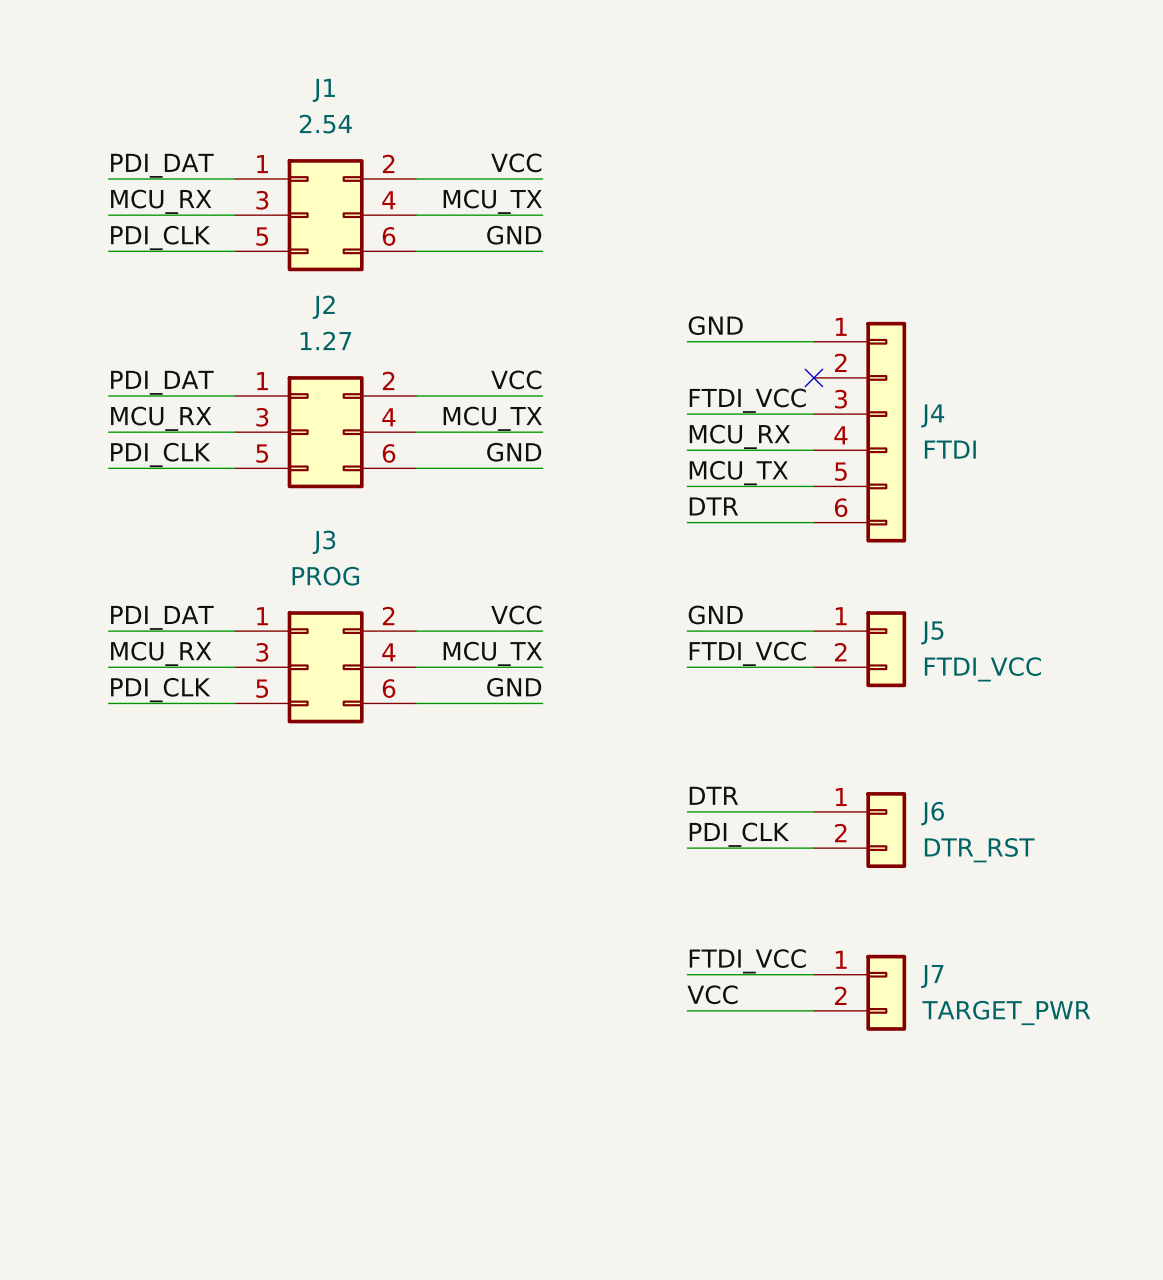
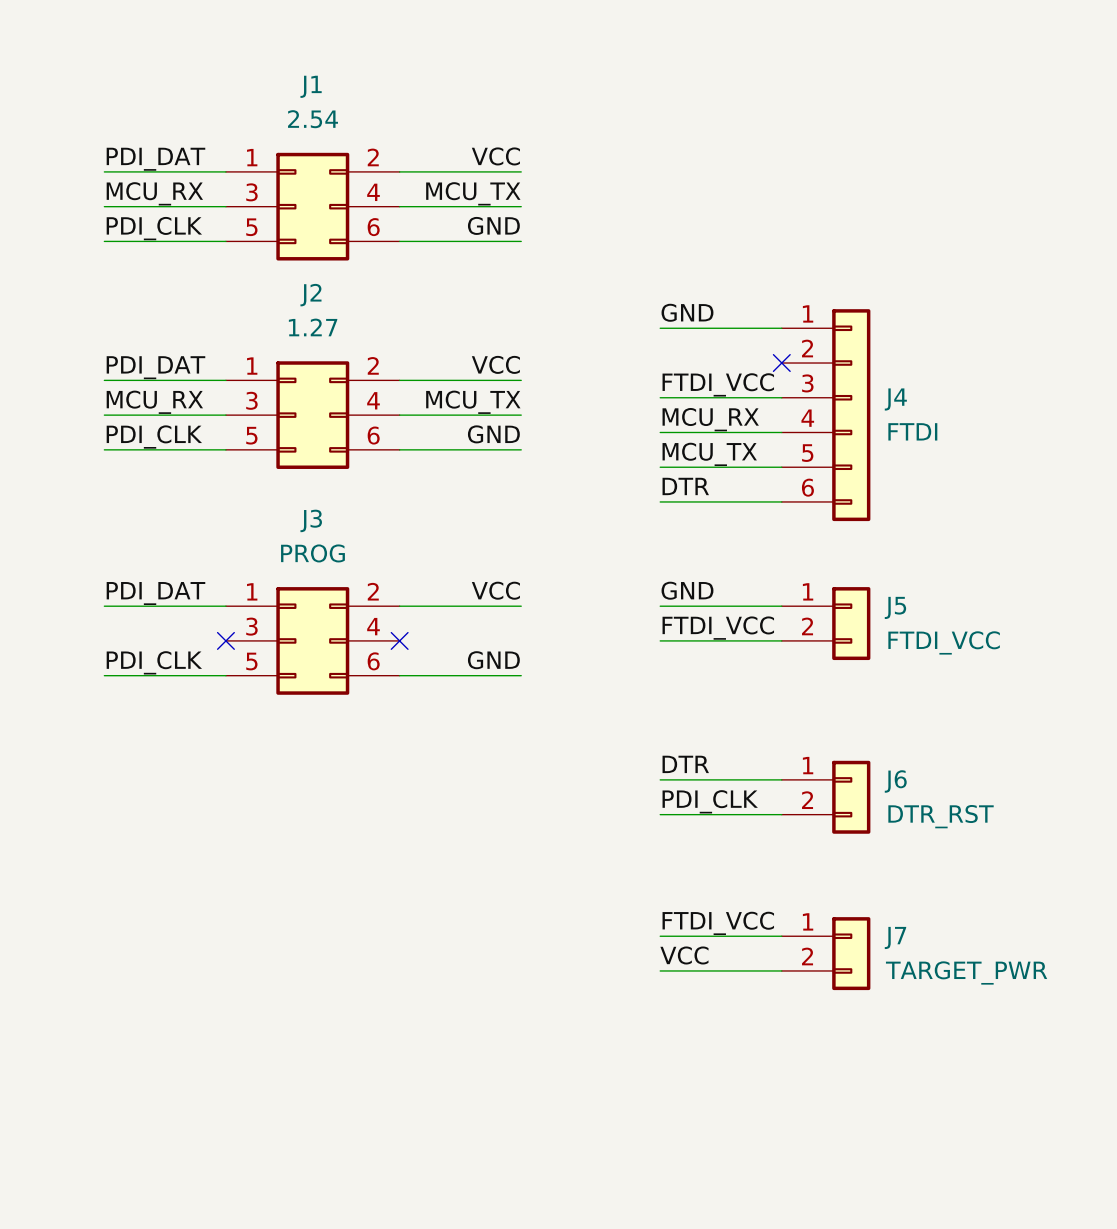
label: MCU_RX (161, 653) -> none
label: MCU_TX (492, 653) -> none
wire: (108, 667) (235, 667) -> none
no-connect mark: none -> (225, 640)
wire: (416, 667) (542, 667) -> none
no-connect mark: none -> (399, 640)

